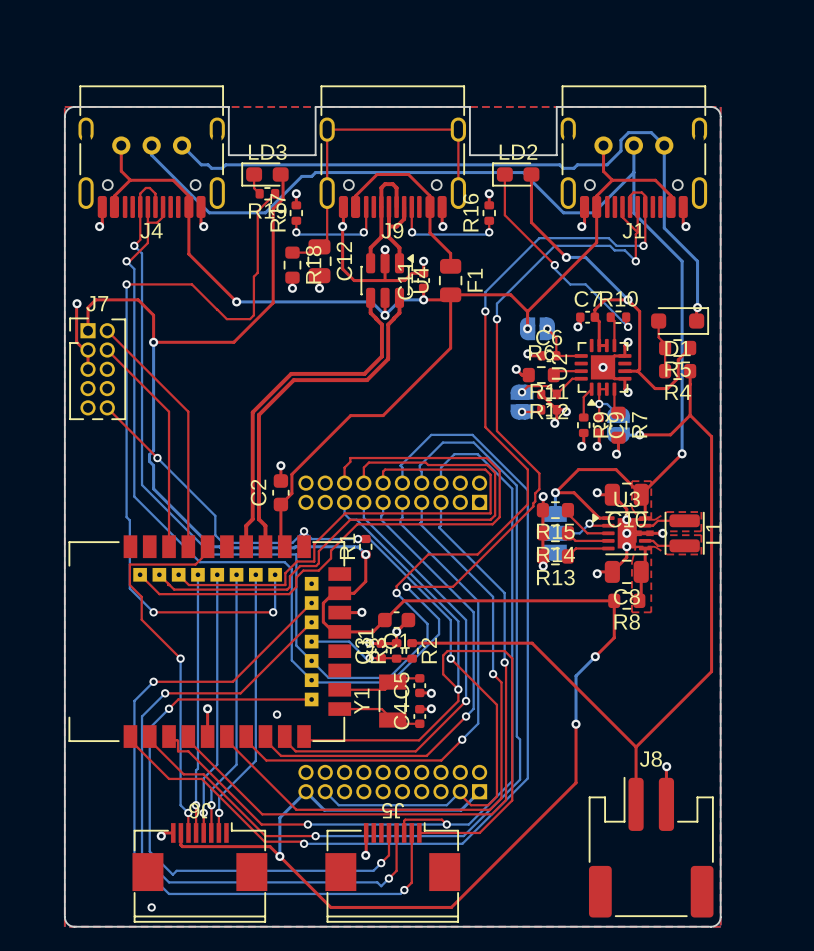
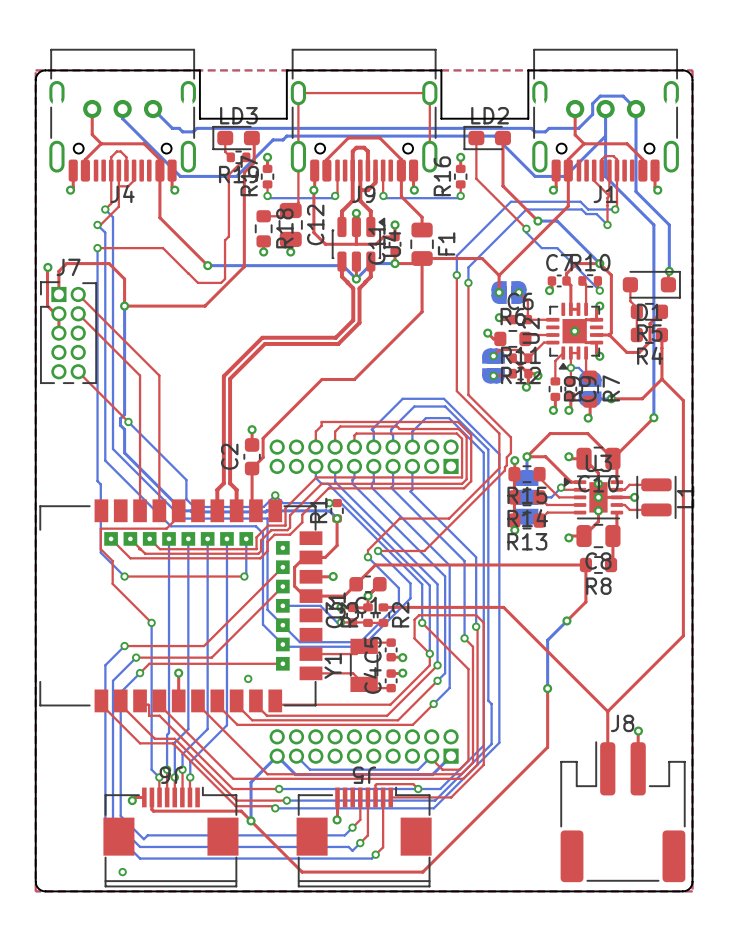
top zone outline: (666, 512) (655, 519) (635, 519) (635, 531) (701, 531) (701, 512) (666, 512) -> none
top zone outline: (639, 519) (631, 508) (631, 481) (651, 481) (651, 519) -> none
top zone outline: (635, 546) (655, 546) (666, 554) (701, 554) (701, 535) (635, 535) (635, 546) -> none
top zone outline: (635, 546) (631, 562) (631, 612) (651, 612) (651, 546) -> none

